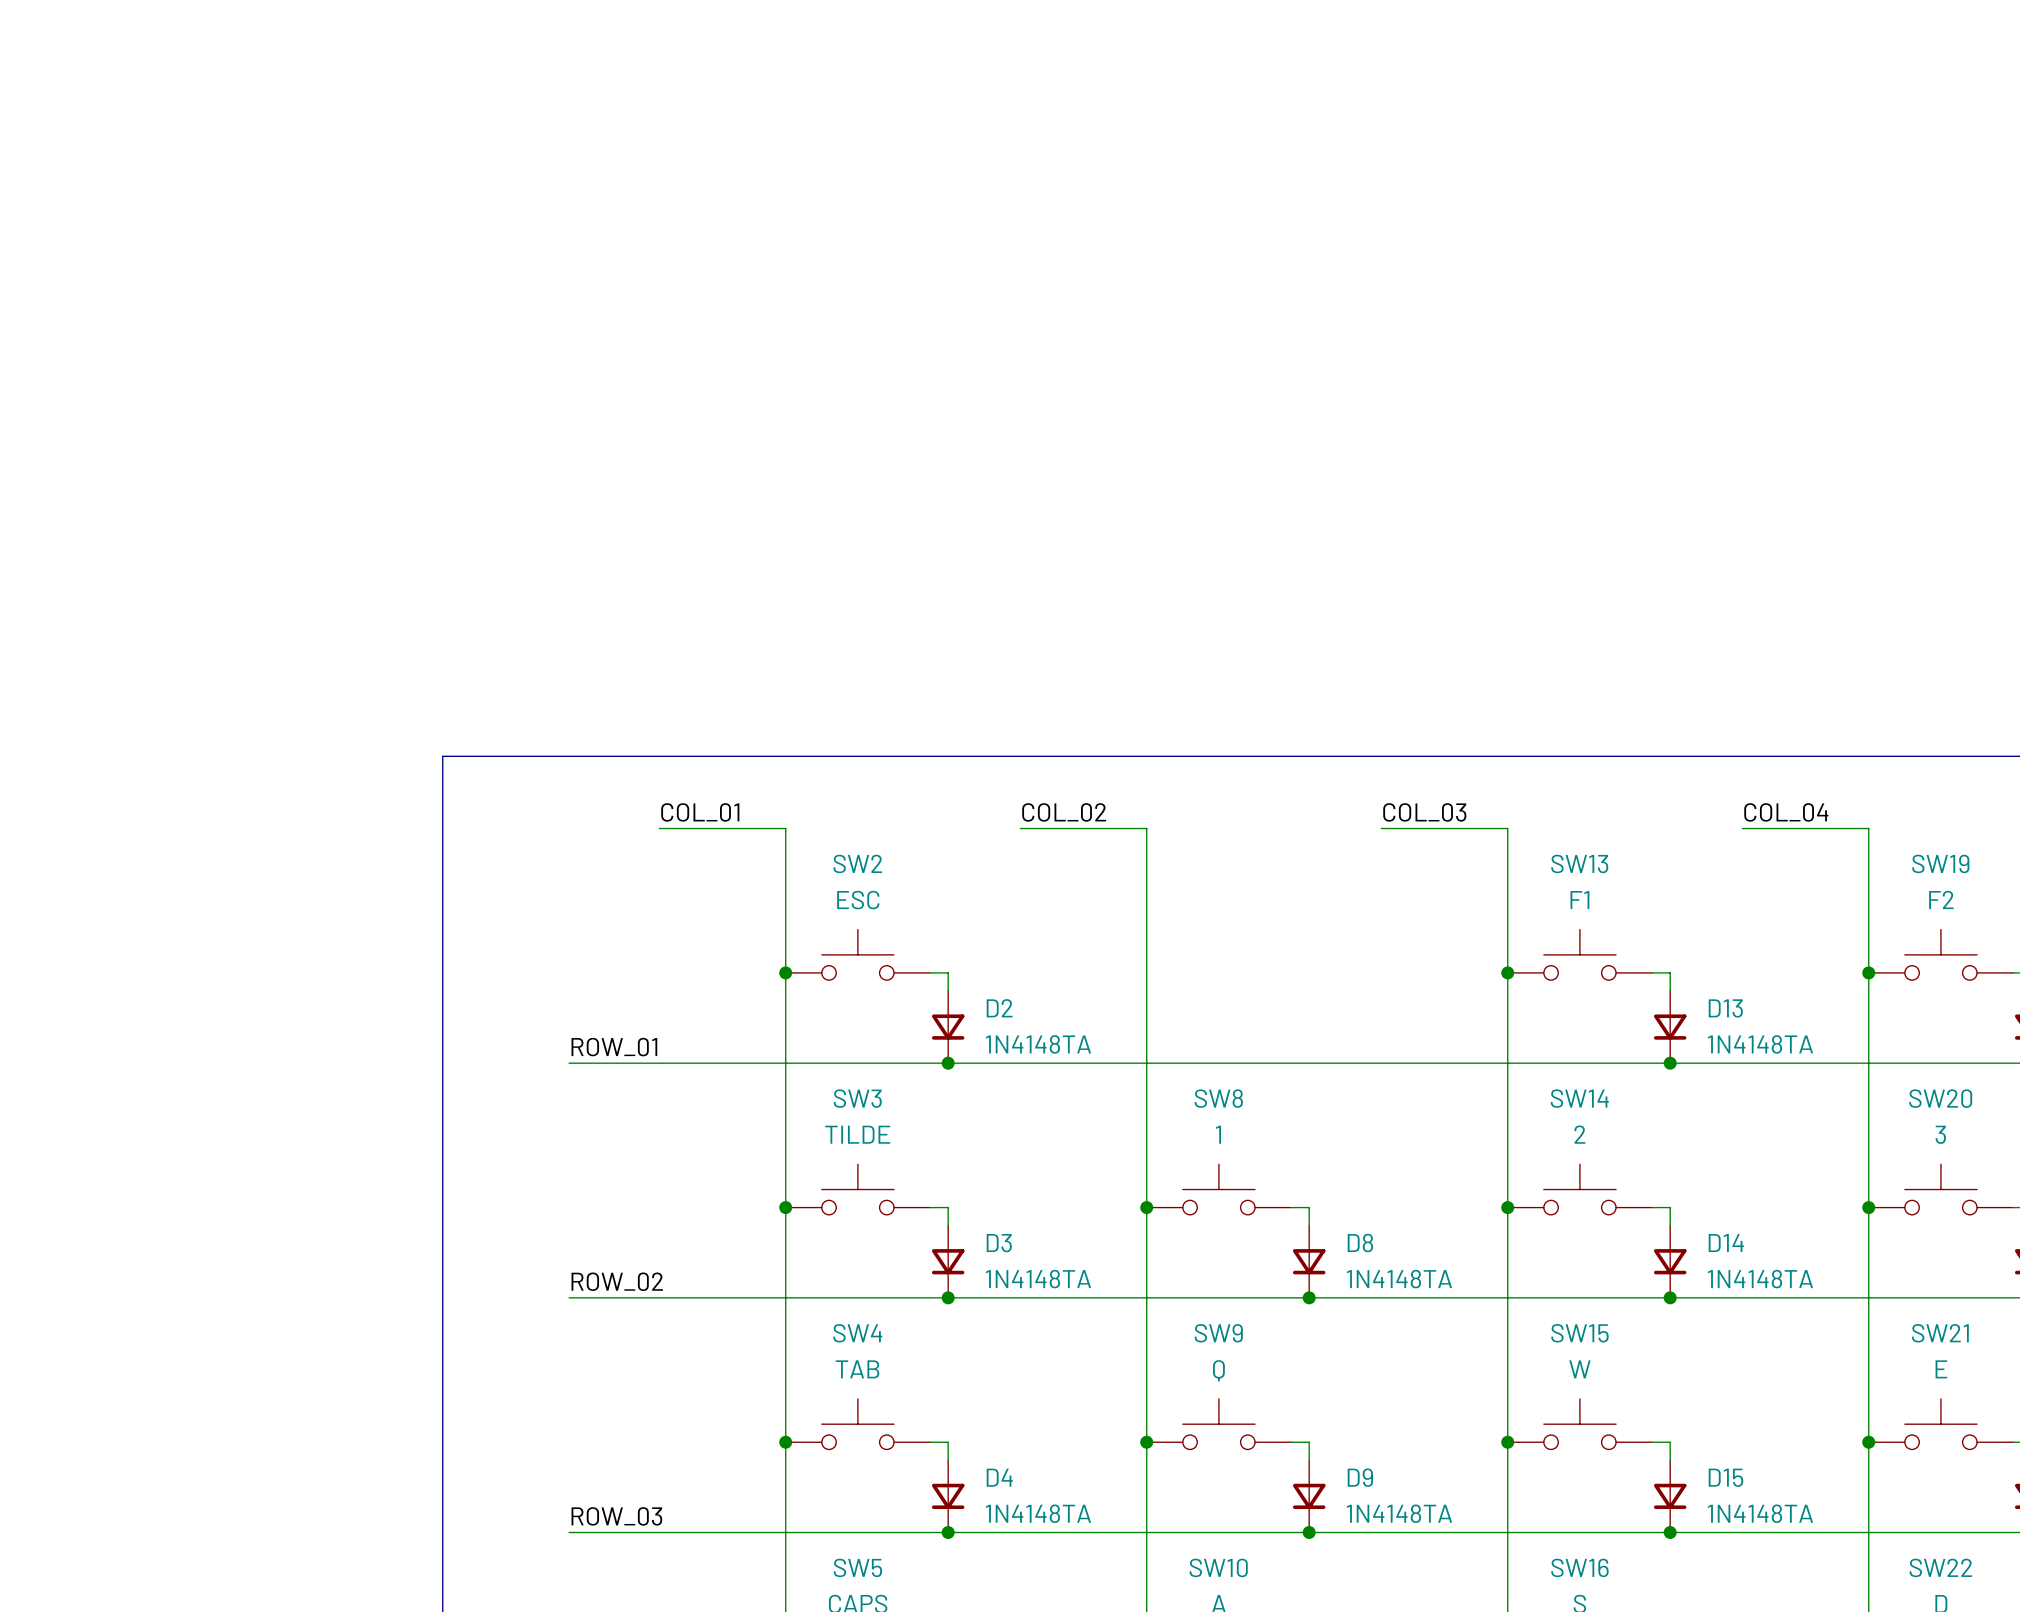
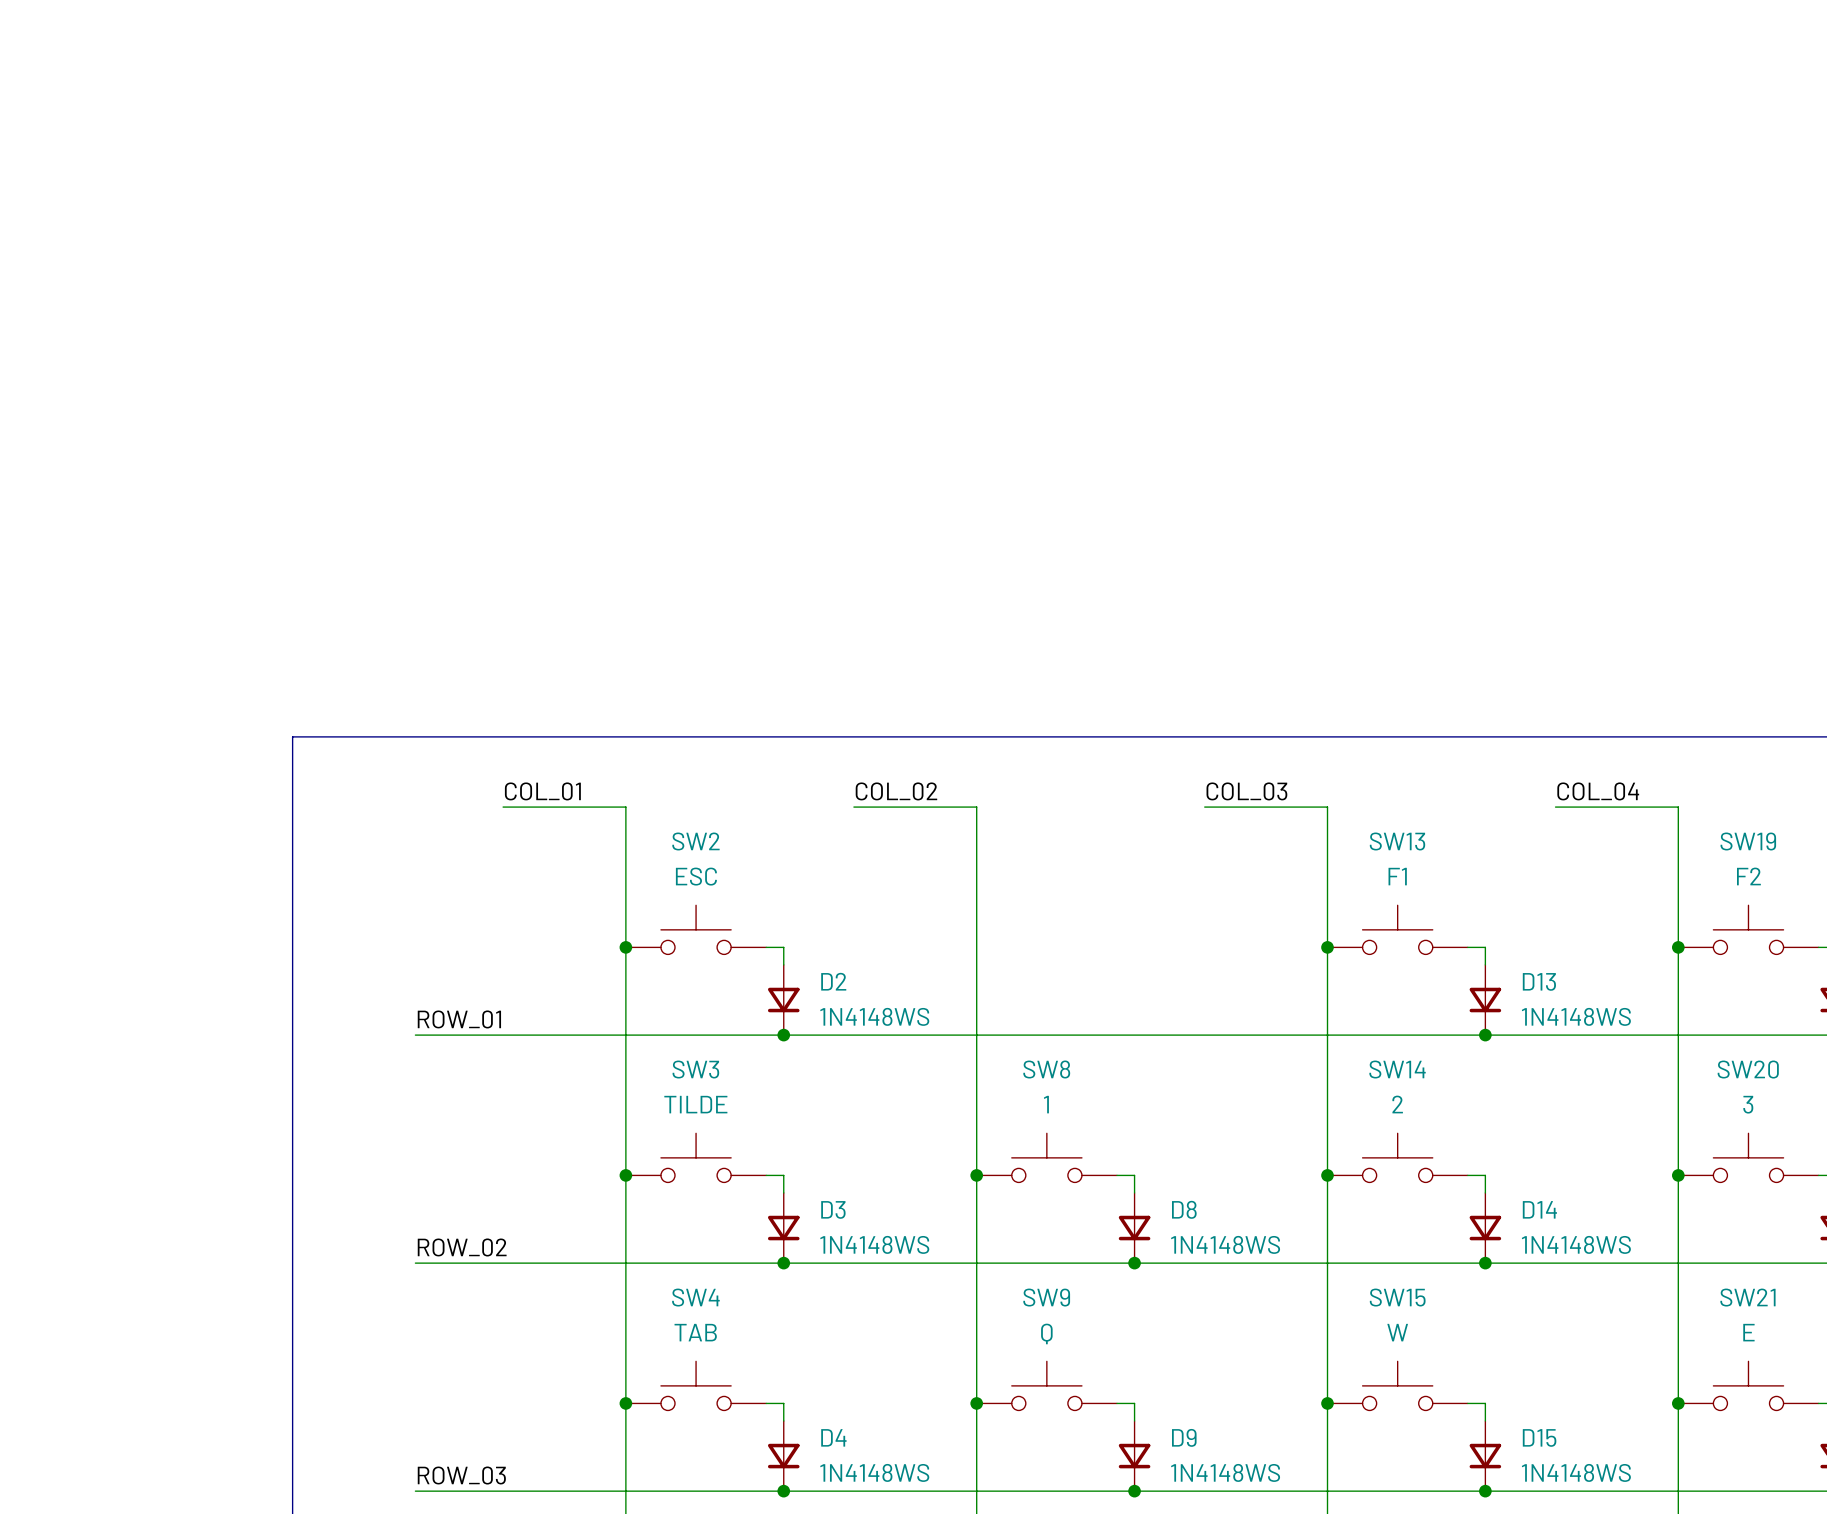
D2 value: 1N4148TA (1038, 1044) -> 1N4148WS (874, 1016)
D13 value: 1N4148TA (1760, 1044) -> 1N4148WS (1576, 1016)
D3 value: 1N4148TA (1038, 1279) -> 1N4148WS (874, 1244)
D8 value: 1N4148TA (1399, 1279) -> 1N4148WS (1225, 1244)
D14 value: 1N4148TA (1760, 1279) -> 1N4148WS (1576, 1244)
D4 value: 1N4148TA (1038, 1513) -> 1N4148WS (874, 1472)
D9 value: 1N4148TA (1399, 1513) -> 1N4148WS (1225, 1472)
D15 value: 1N4148TA (1760, 1513) -> 1N4148WS (1576, 1472)

